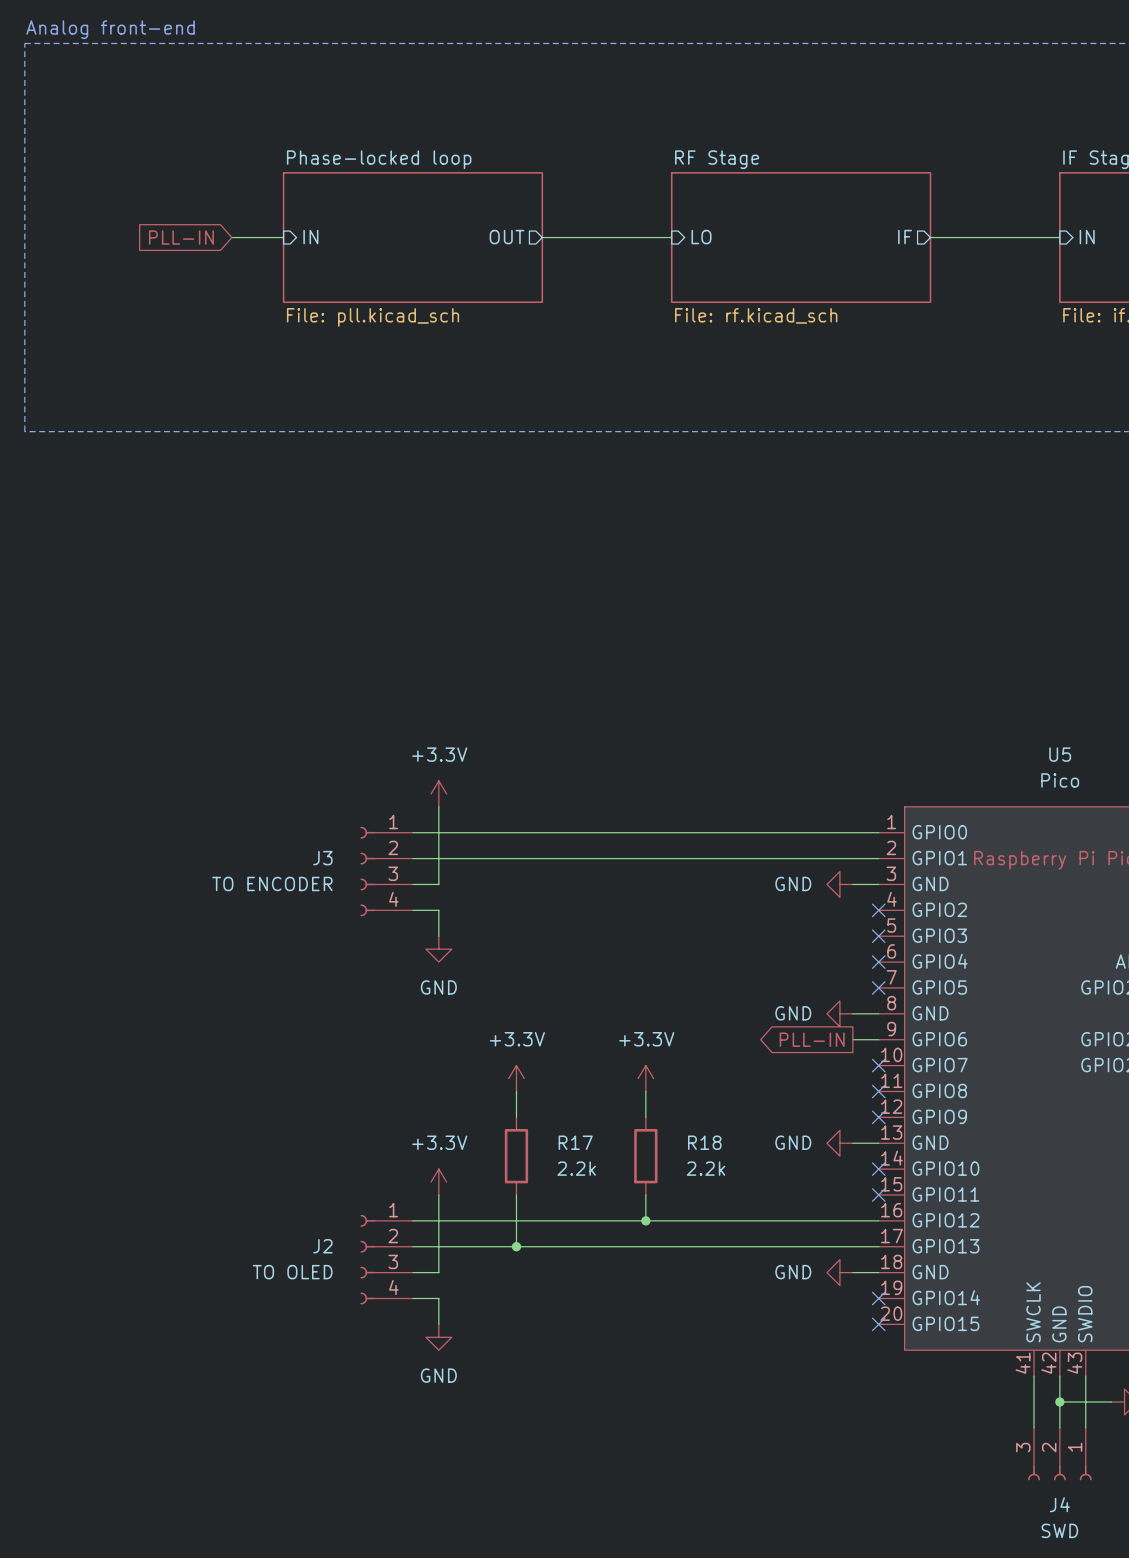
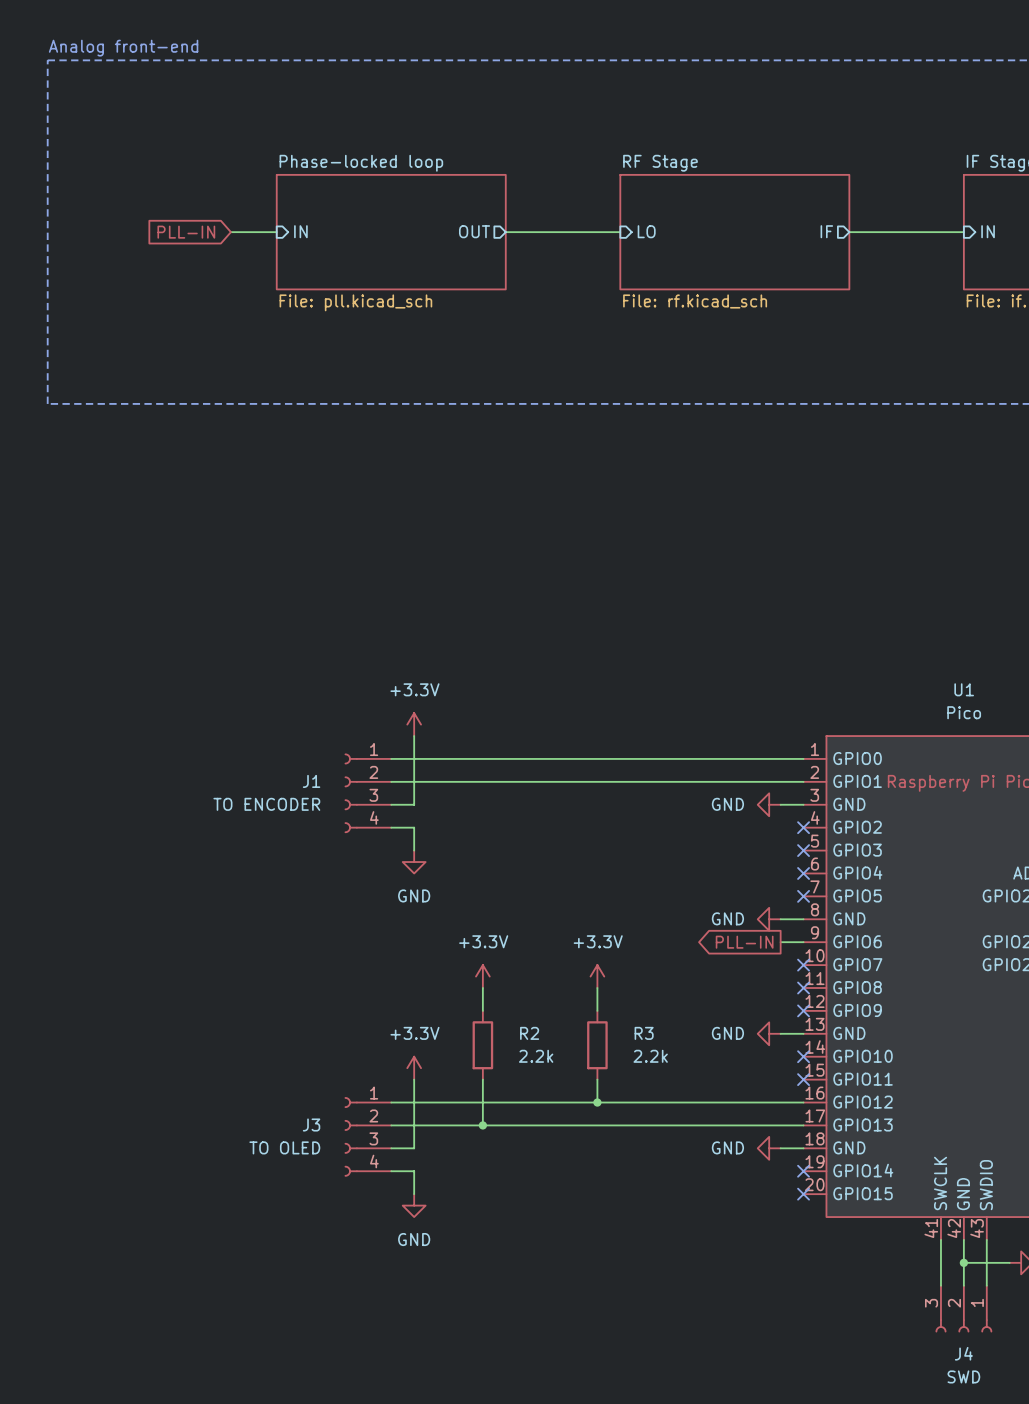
U5 name: U5 (1060, 754) -> U1 (964, 689)
J3 name: J3 (322, 858) -> J1 (311, 781)
R17 name: R17 (575, 1142) -> R2 (529, 1033)
R18 name: R18 (704, 1142) -> R3 (644, 1033)
J2 name: J2 (322, 1246) -> J3 (311, 1125)

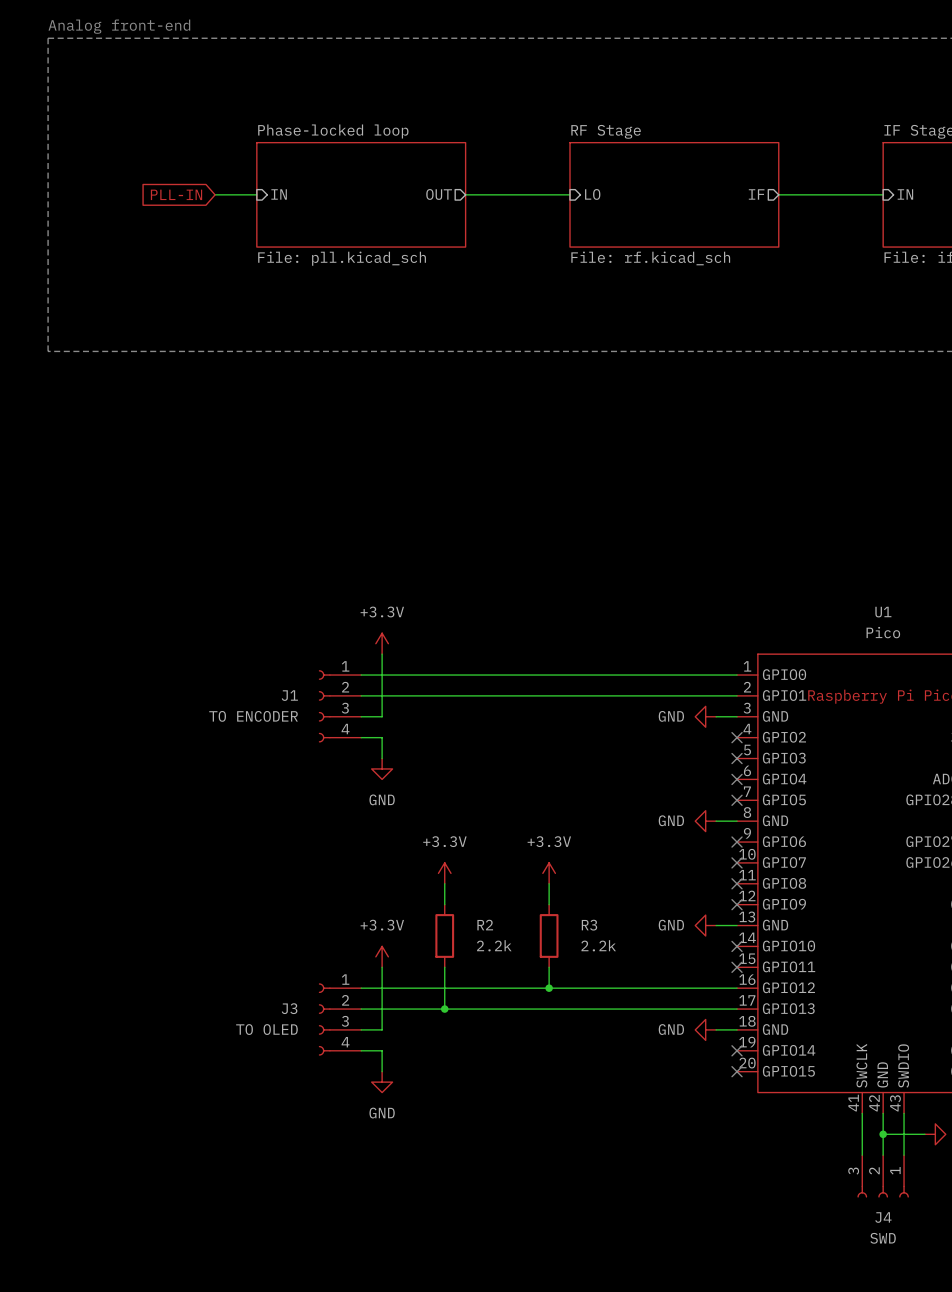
global label: PLL-IN (744, 942) -> none
wire: (780, 942) (803, 942) -> none
no-connect mark: none -> (737, 842)

